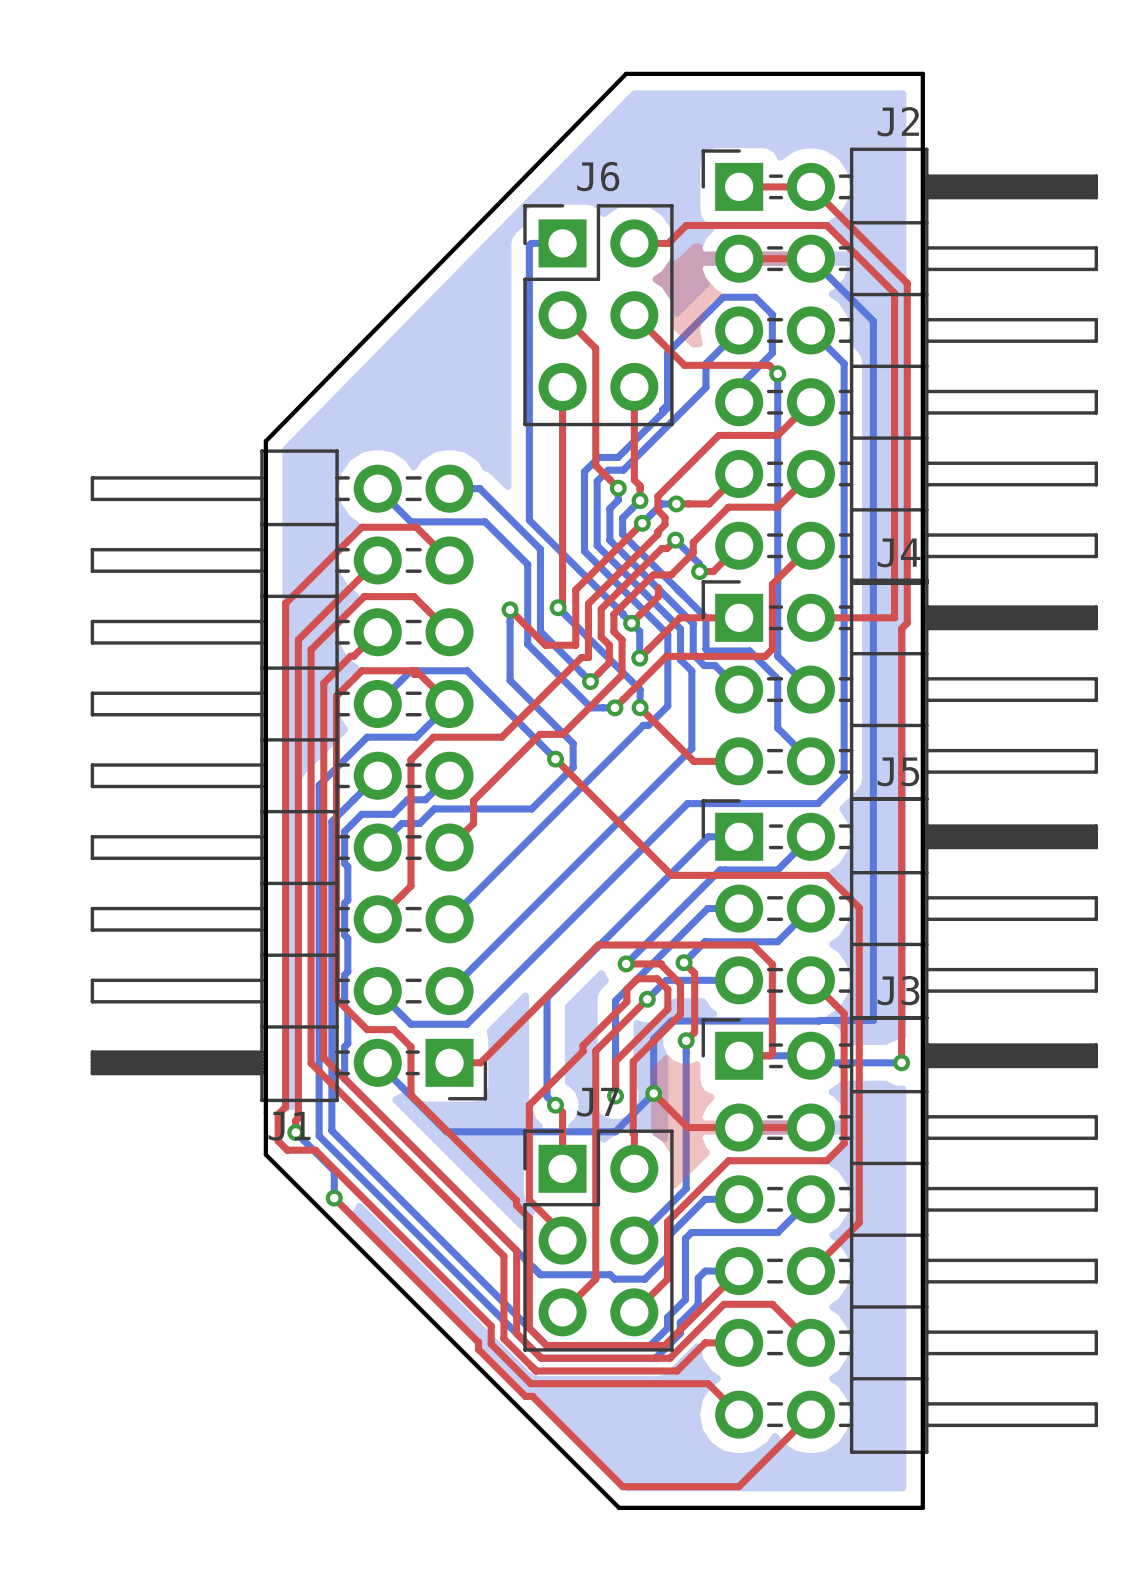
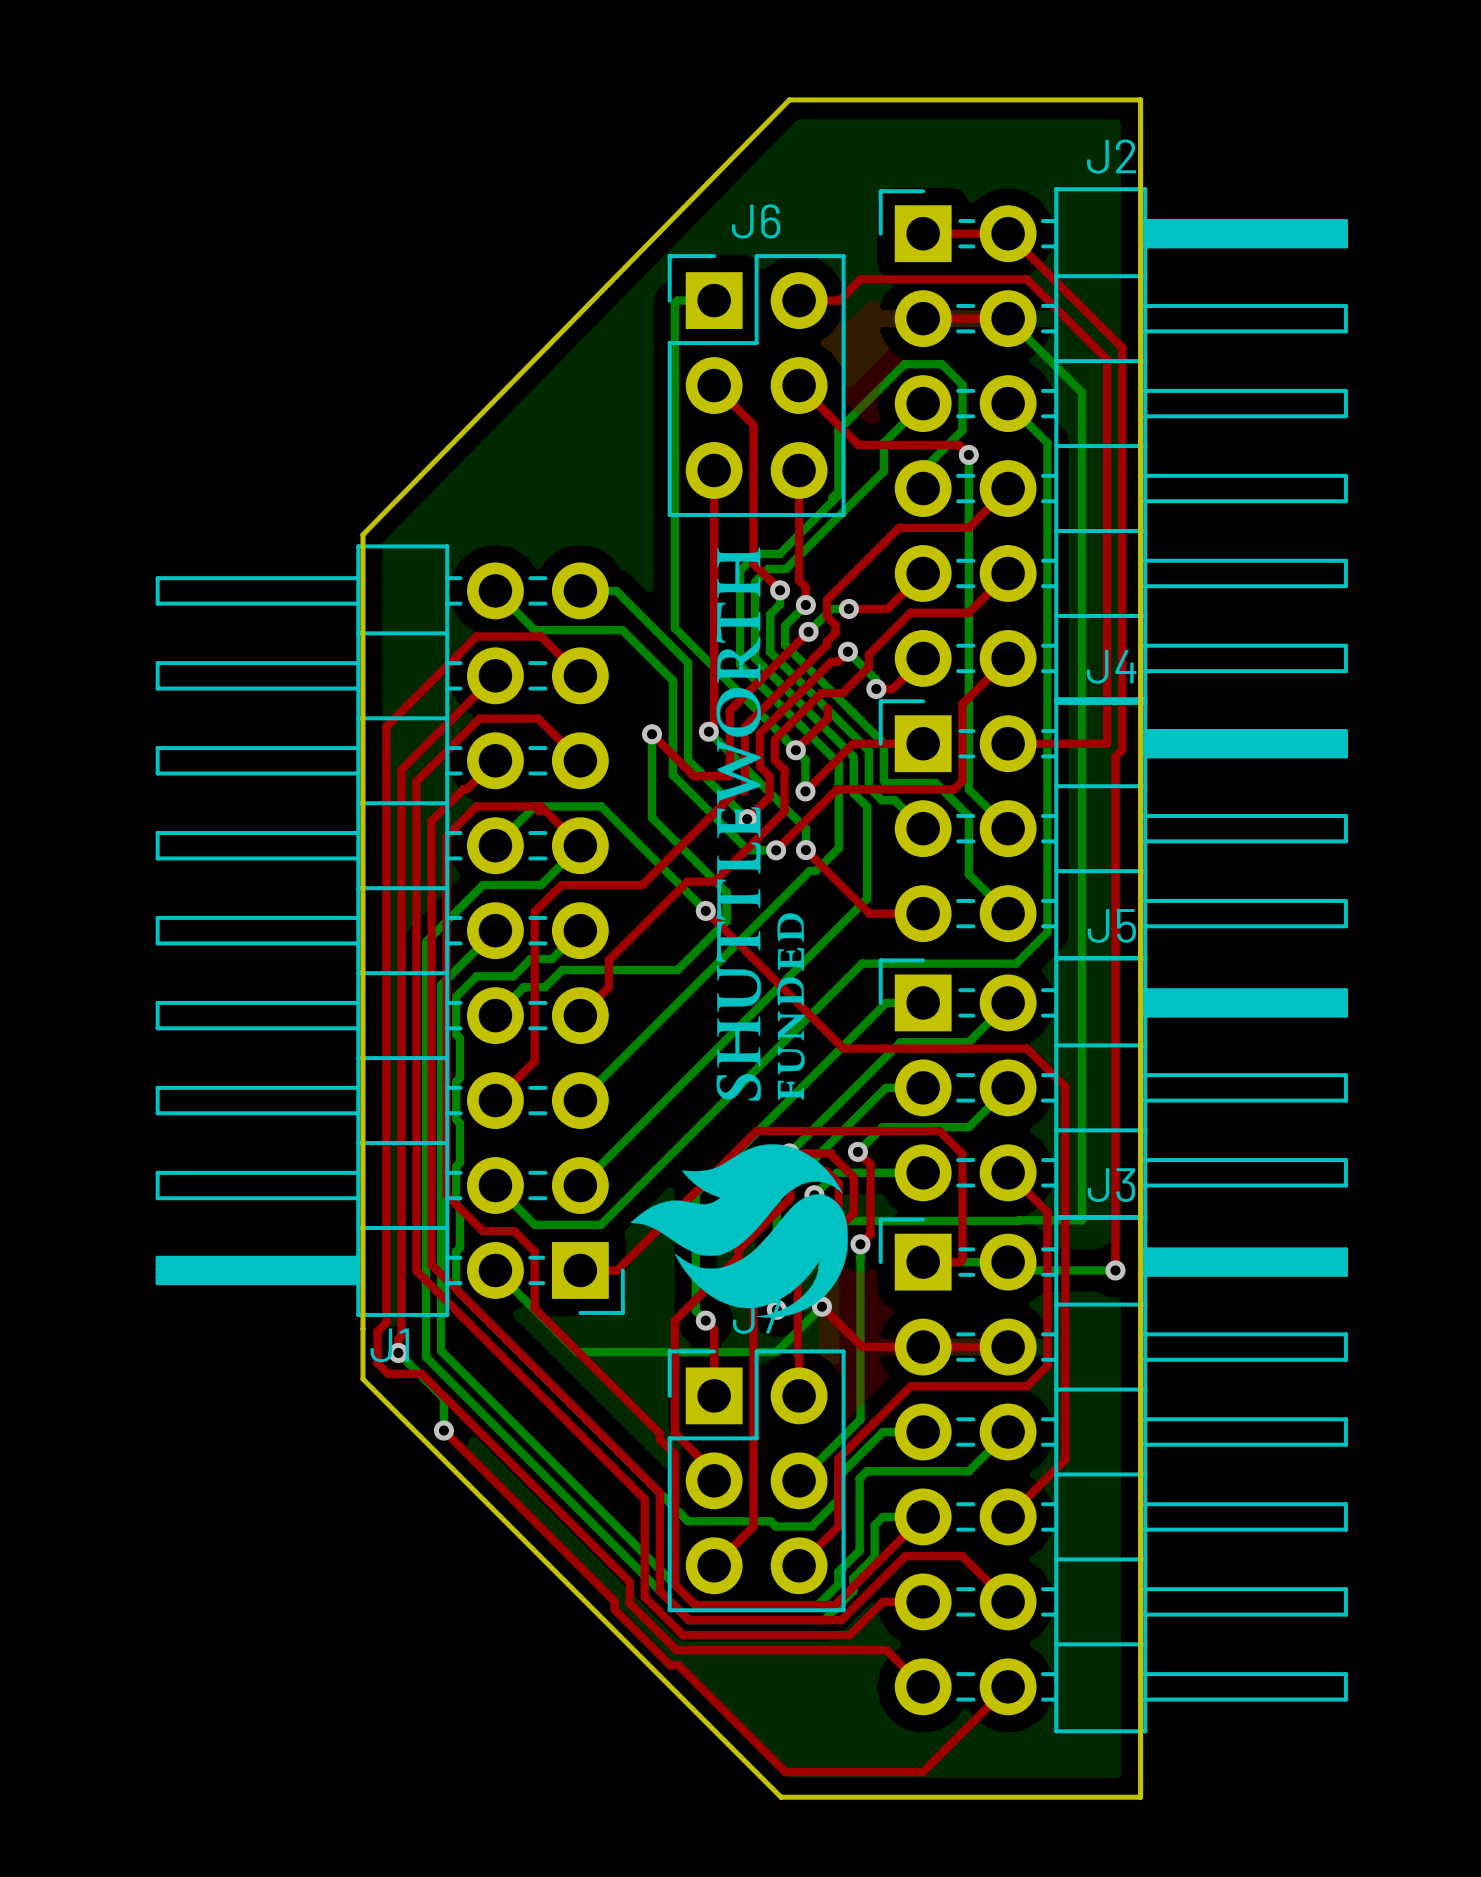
drawing: none -> [630, 547, 848, 1318]

